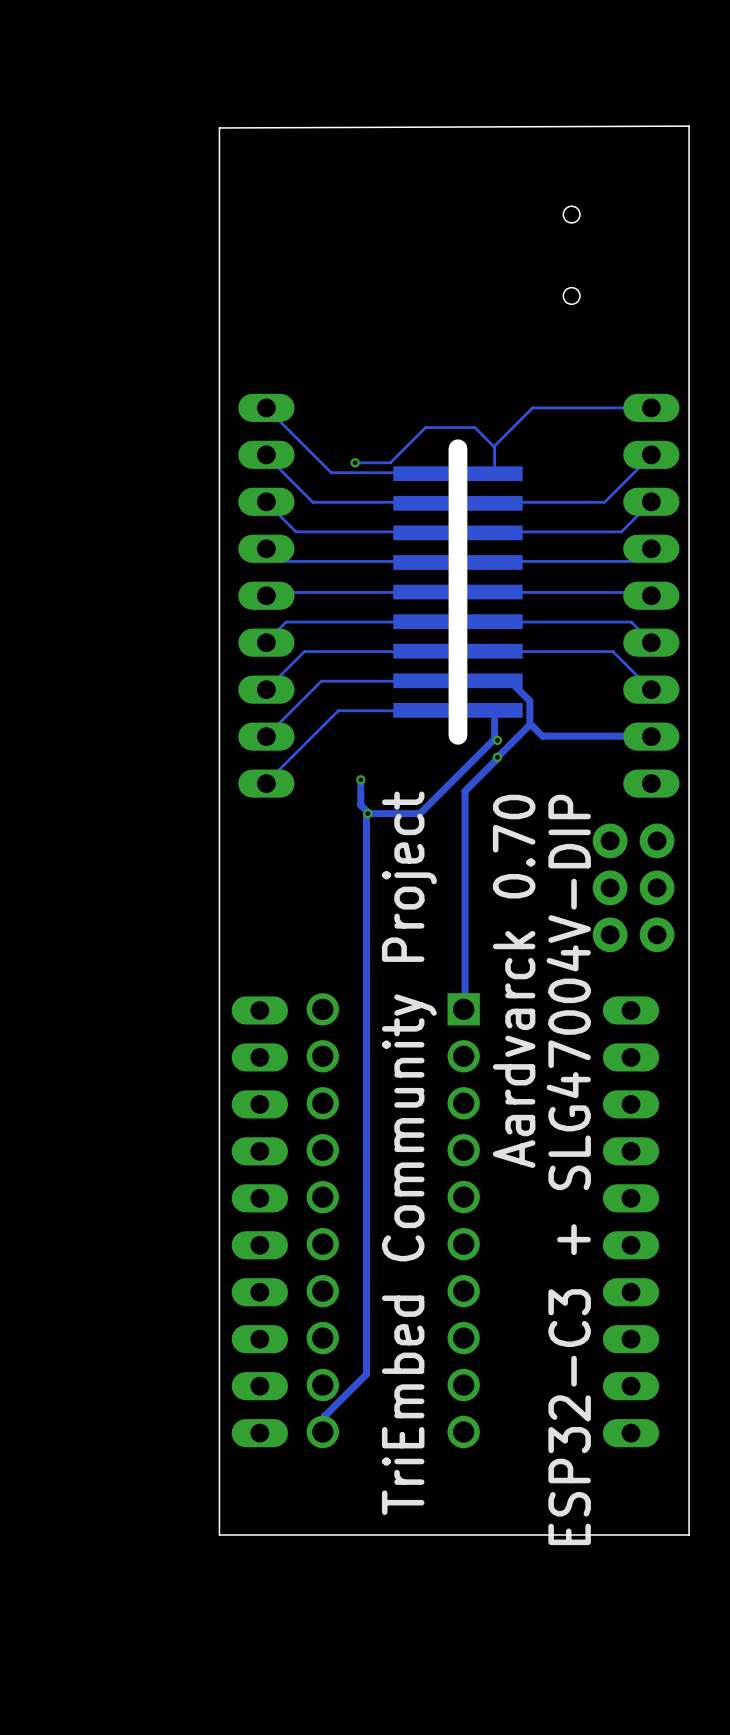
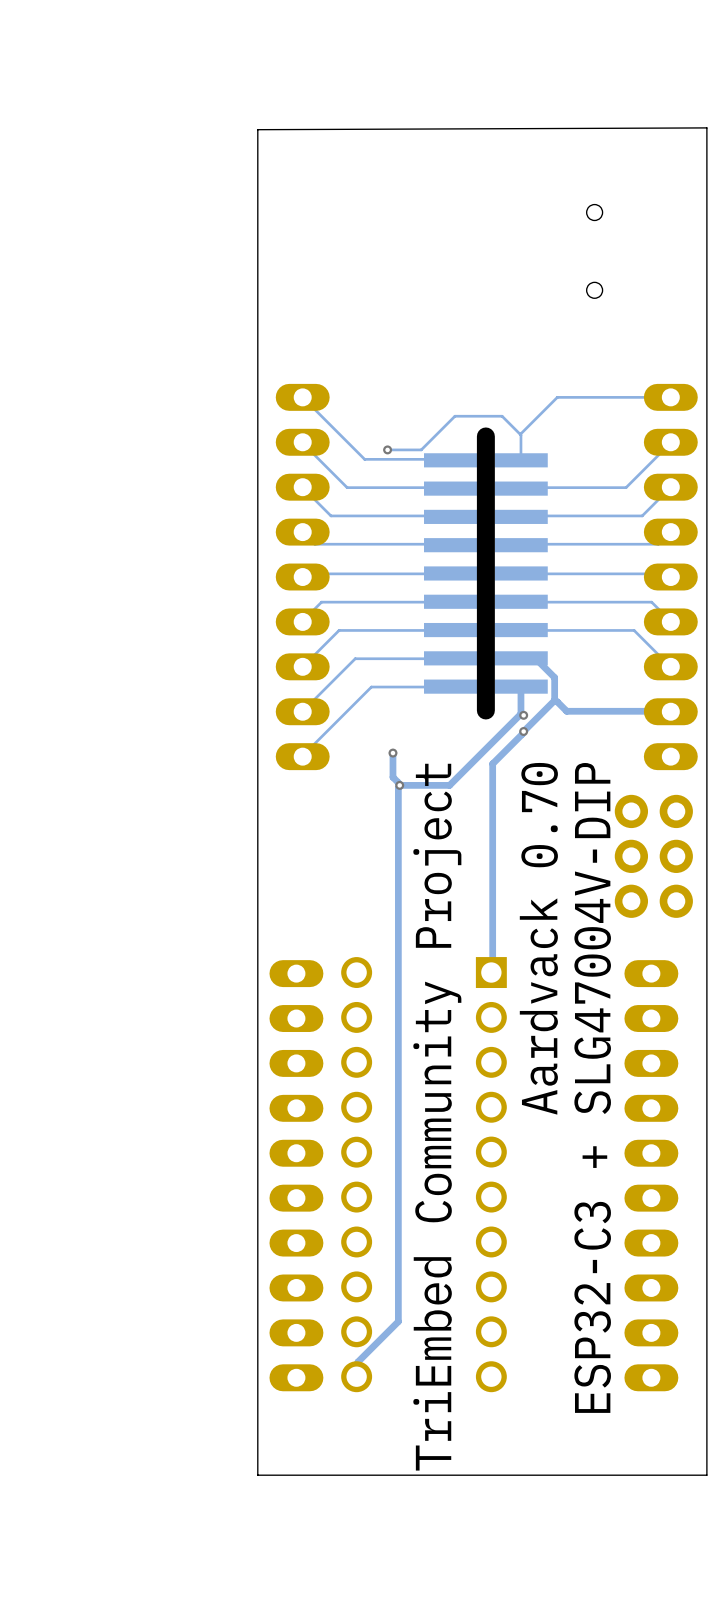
text: Aardvarck 0.70 (514, 981) -> Aardvack 0.70 (538, 938)

